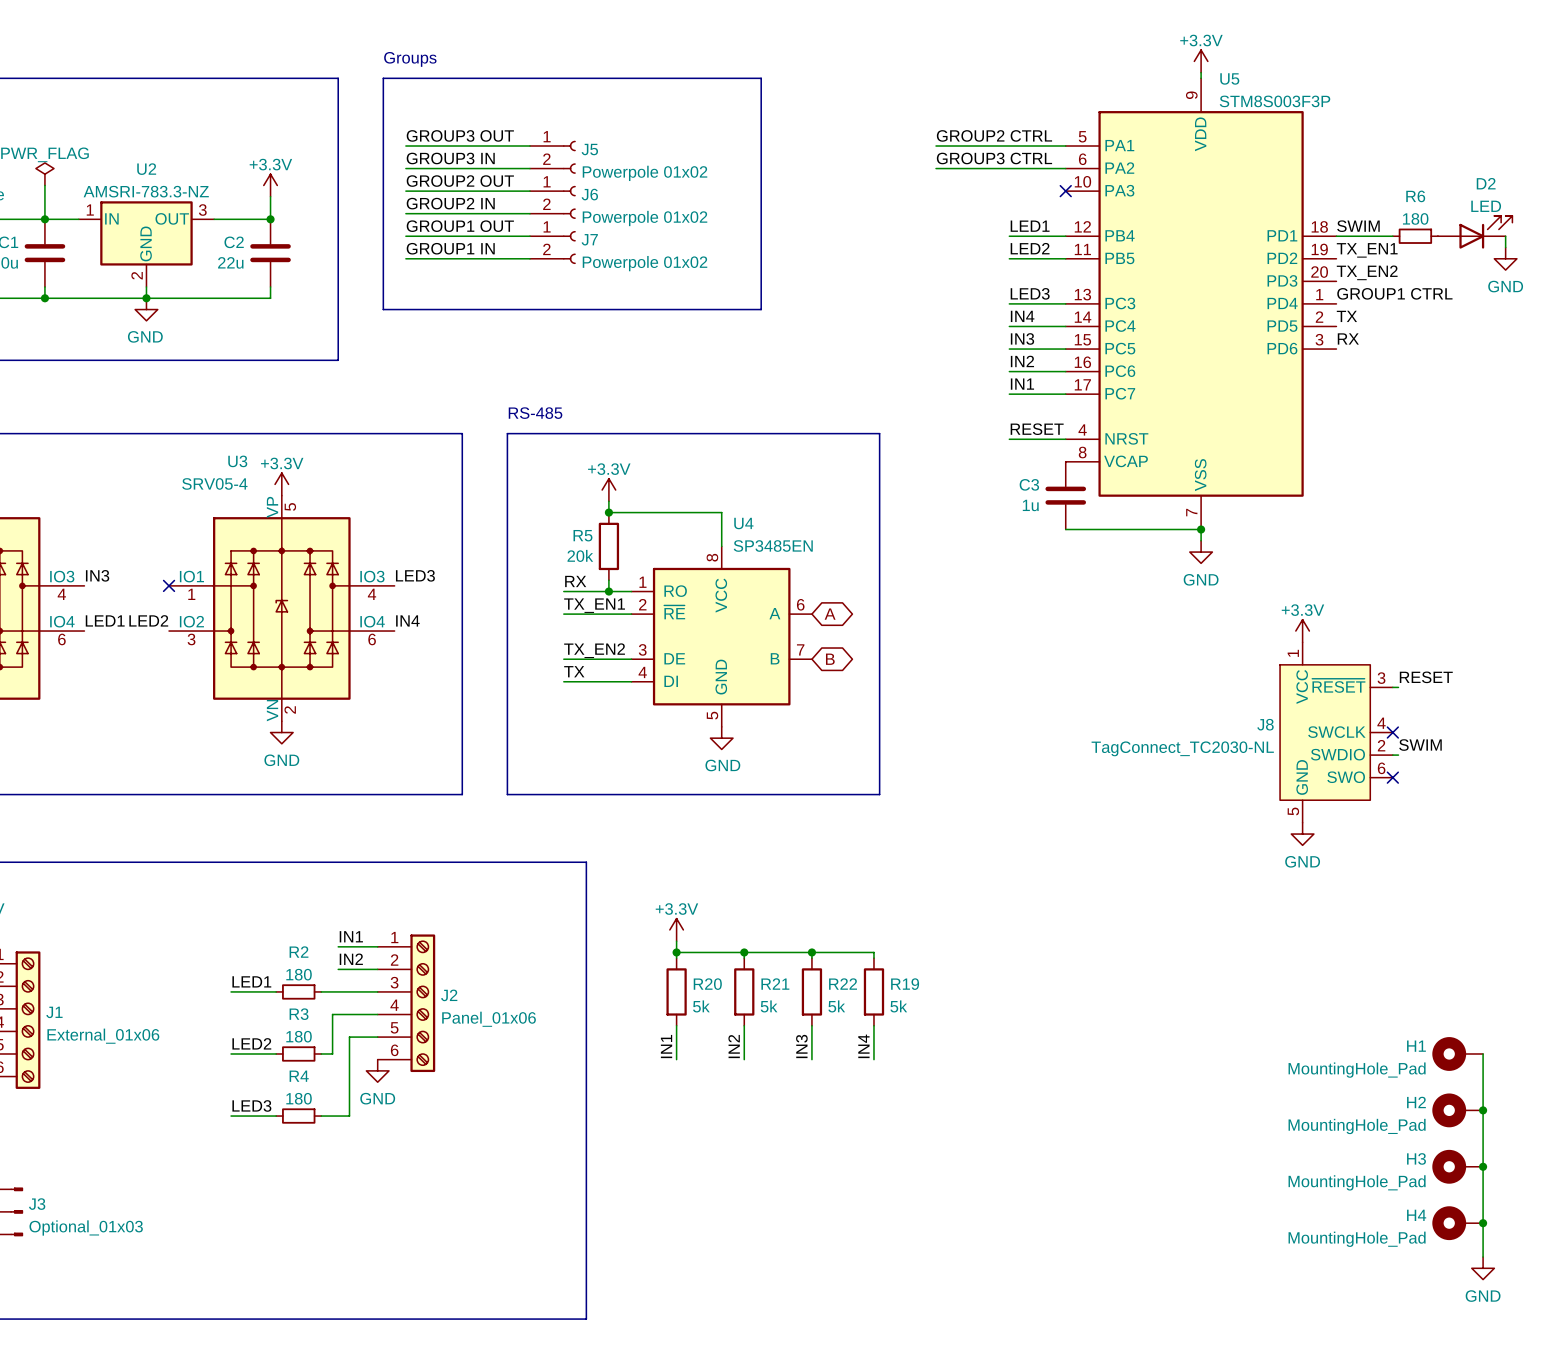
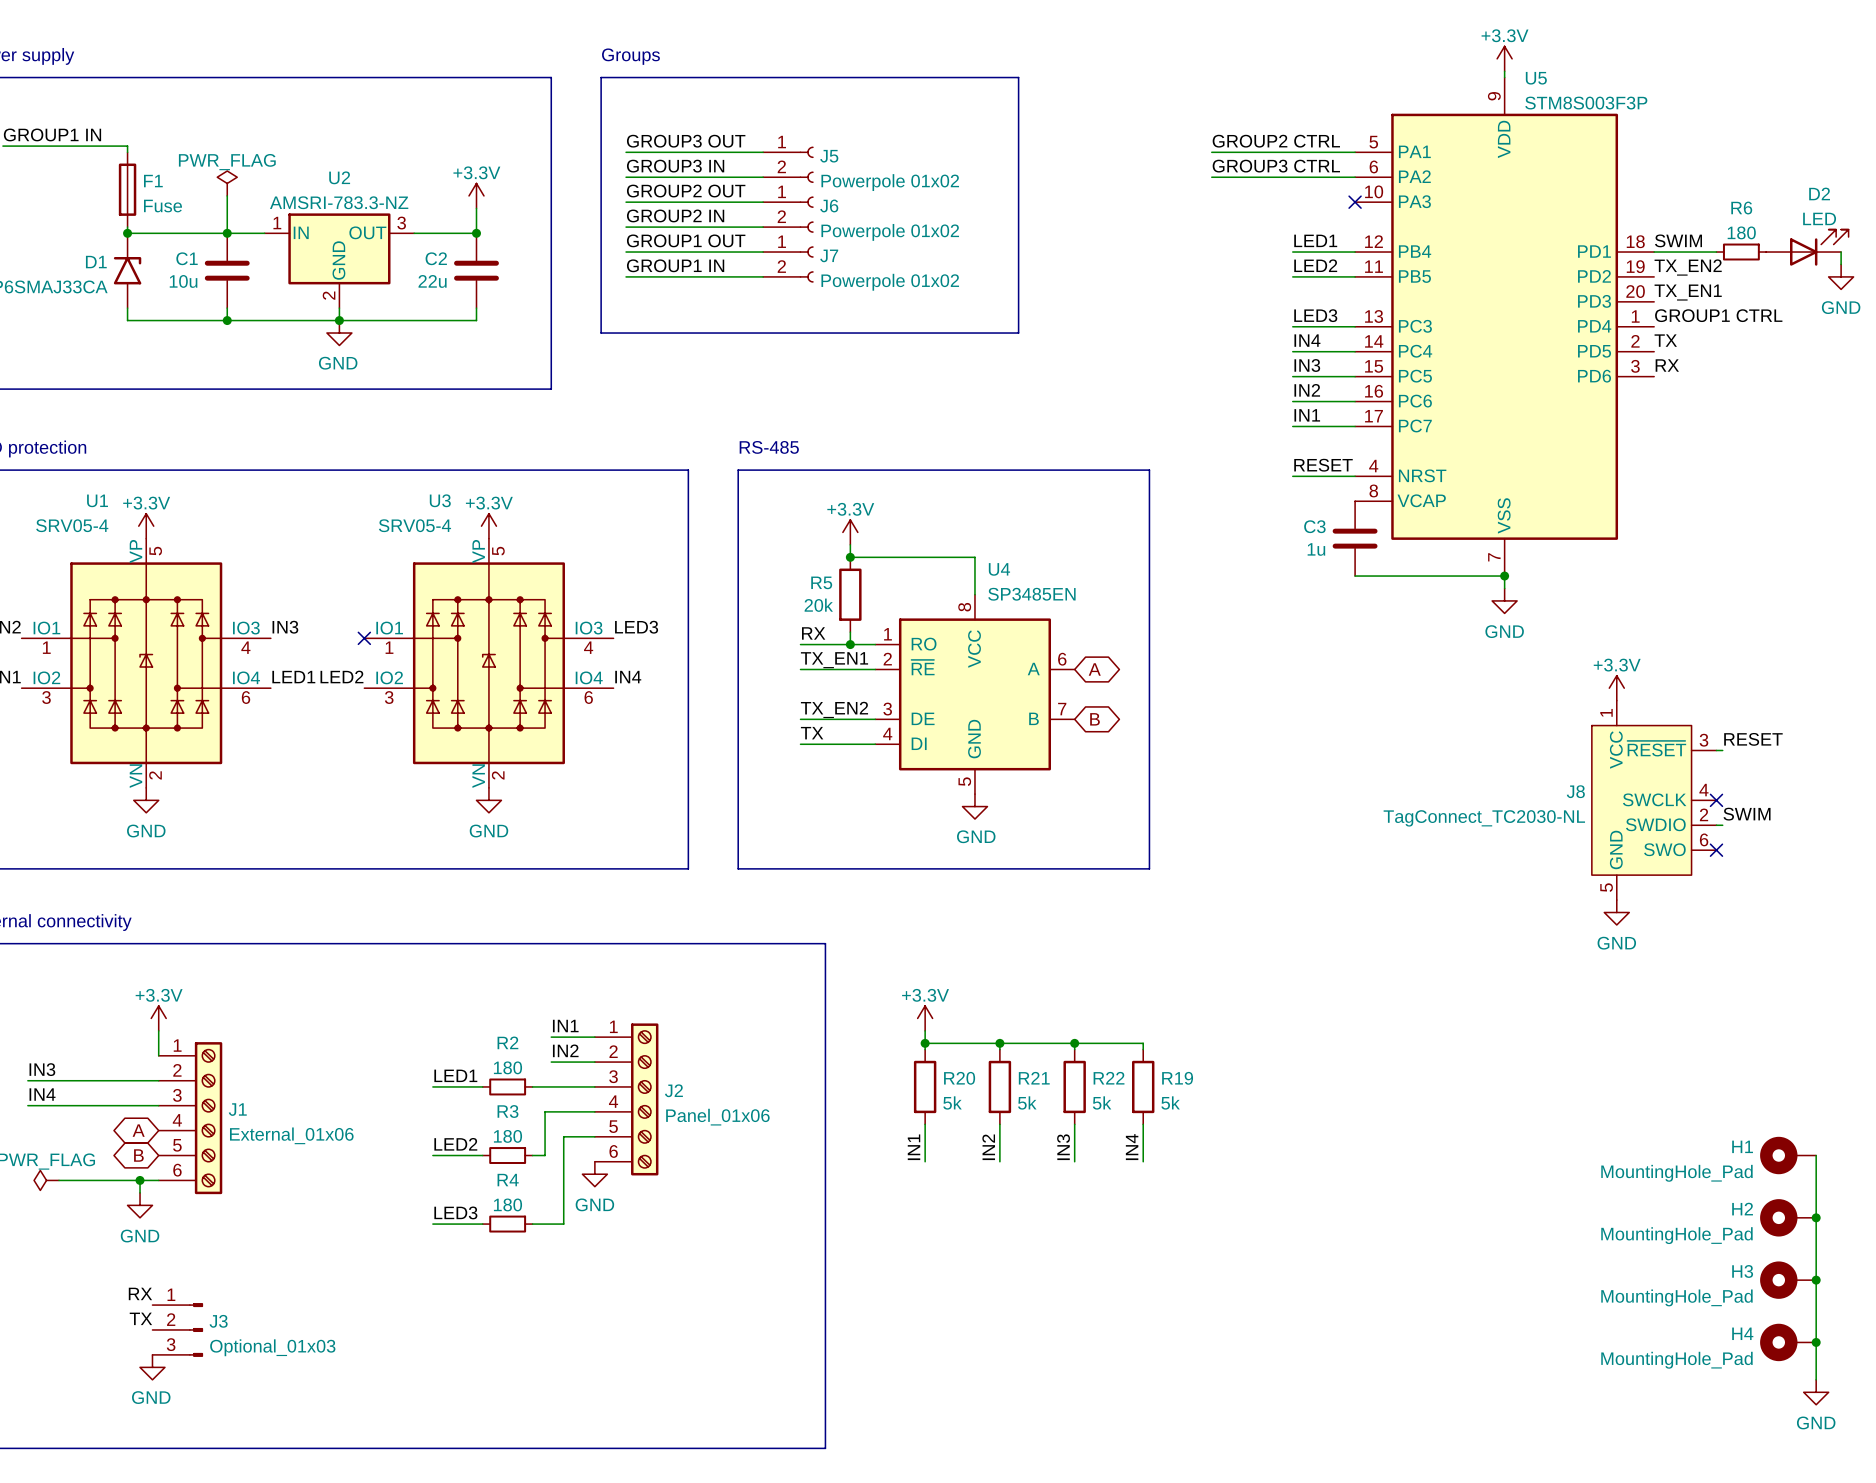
label: TX_EN1 (1367, 250) -> TX_EN2 (1688, 267)
label: TX_EN2 (1367, 272) -> TX_EN1 (1688, 292)

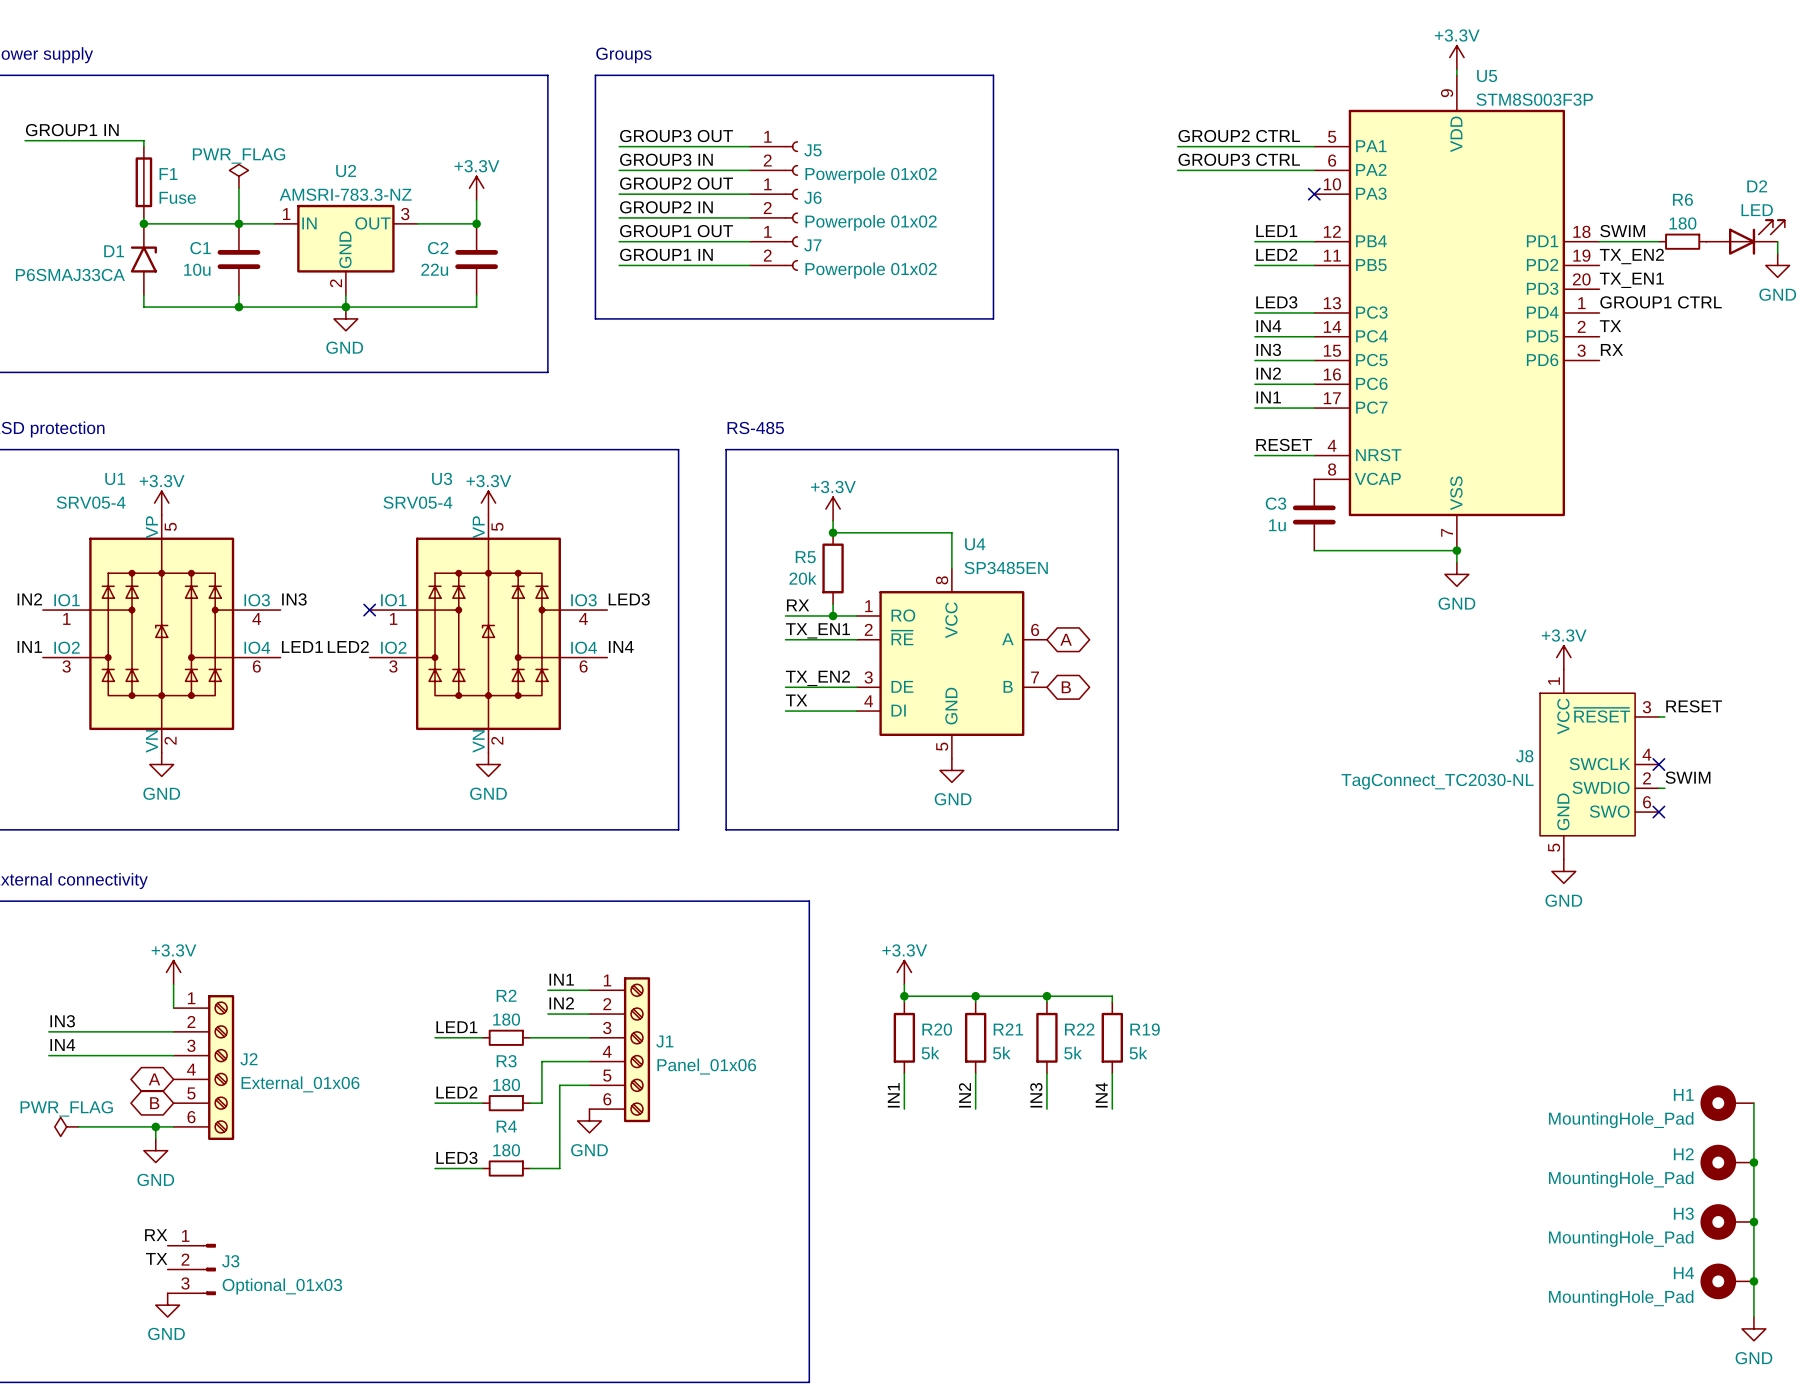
J2 name: J2 (673, 1090) -> J1 (664, 1041)
J1 name: J1 (237, 1109) -> J2 (248, 1059)

